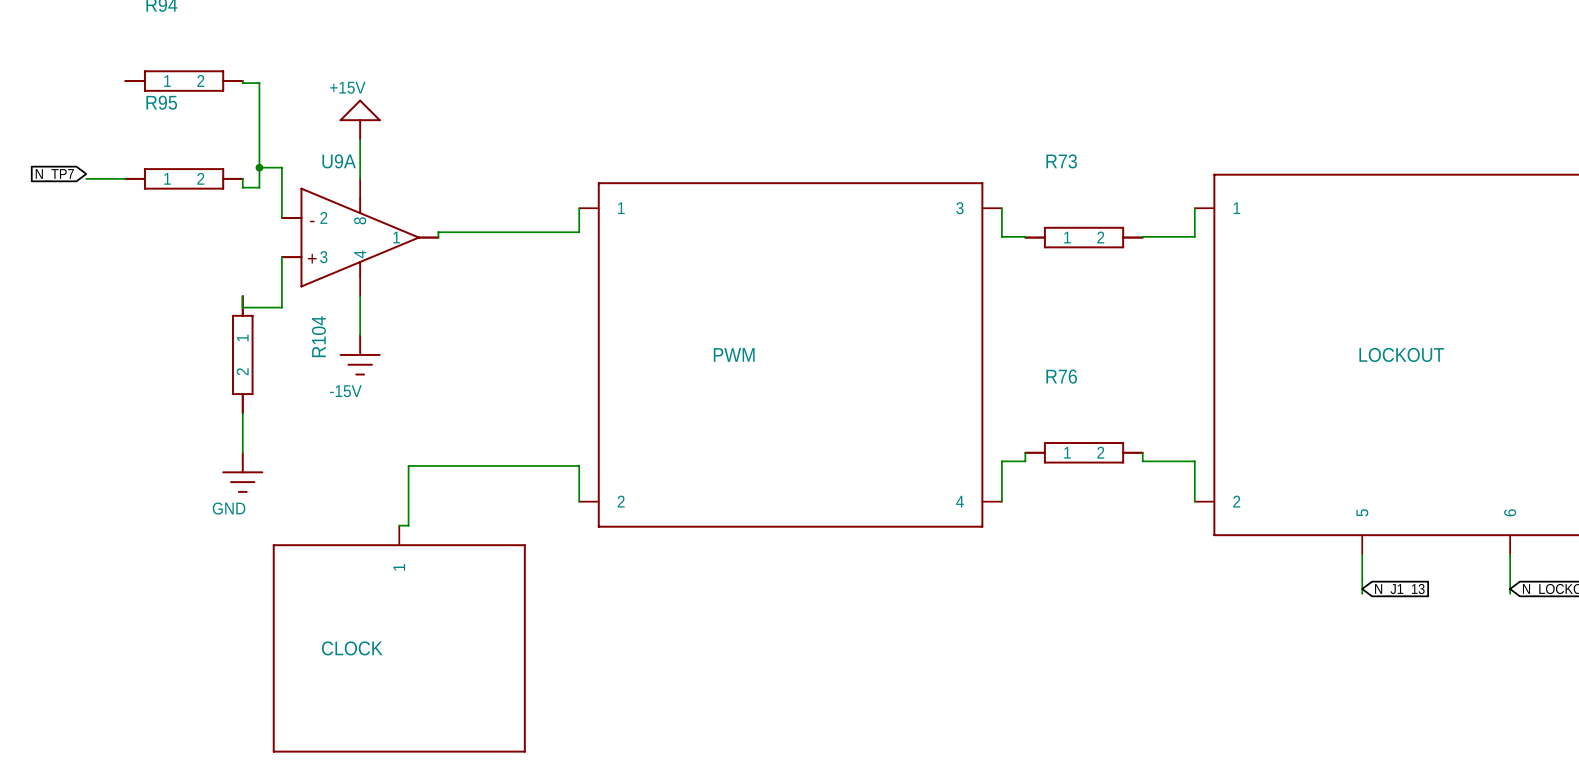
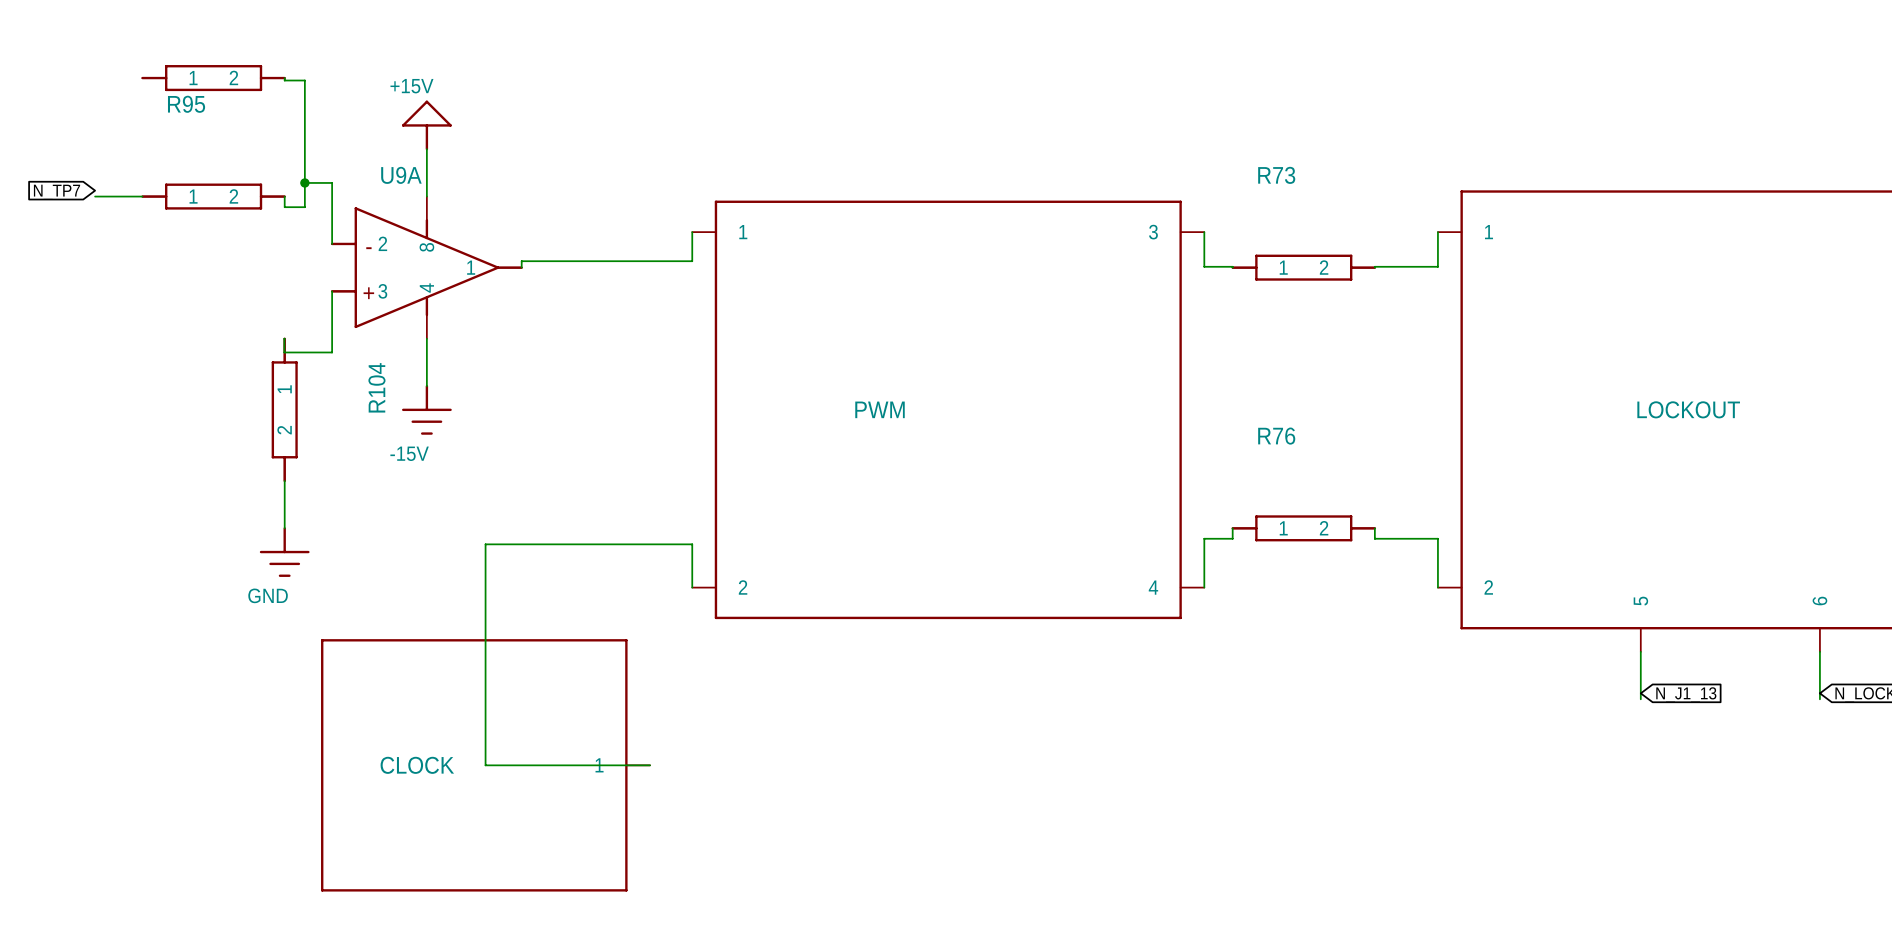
wire: (399, 525) (408, 525) -> (650, 765) (485, 765) (485, 616)
CLOCK: (399, 639) -> none
CLOCK: none -> (485, 765)

